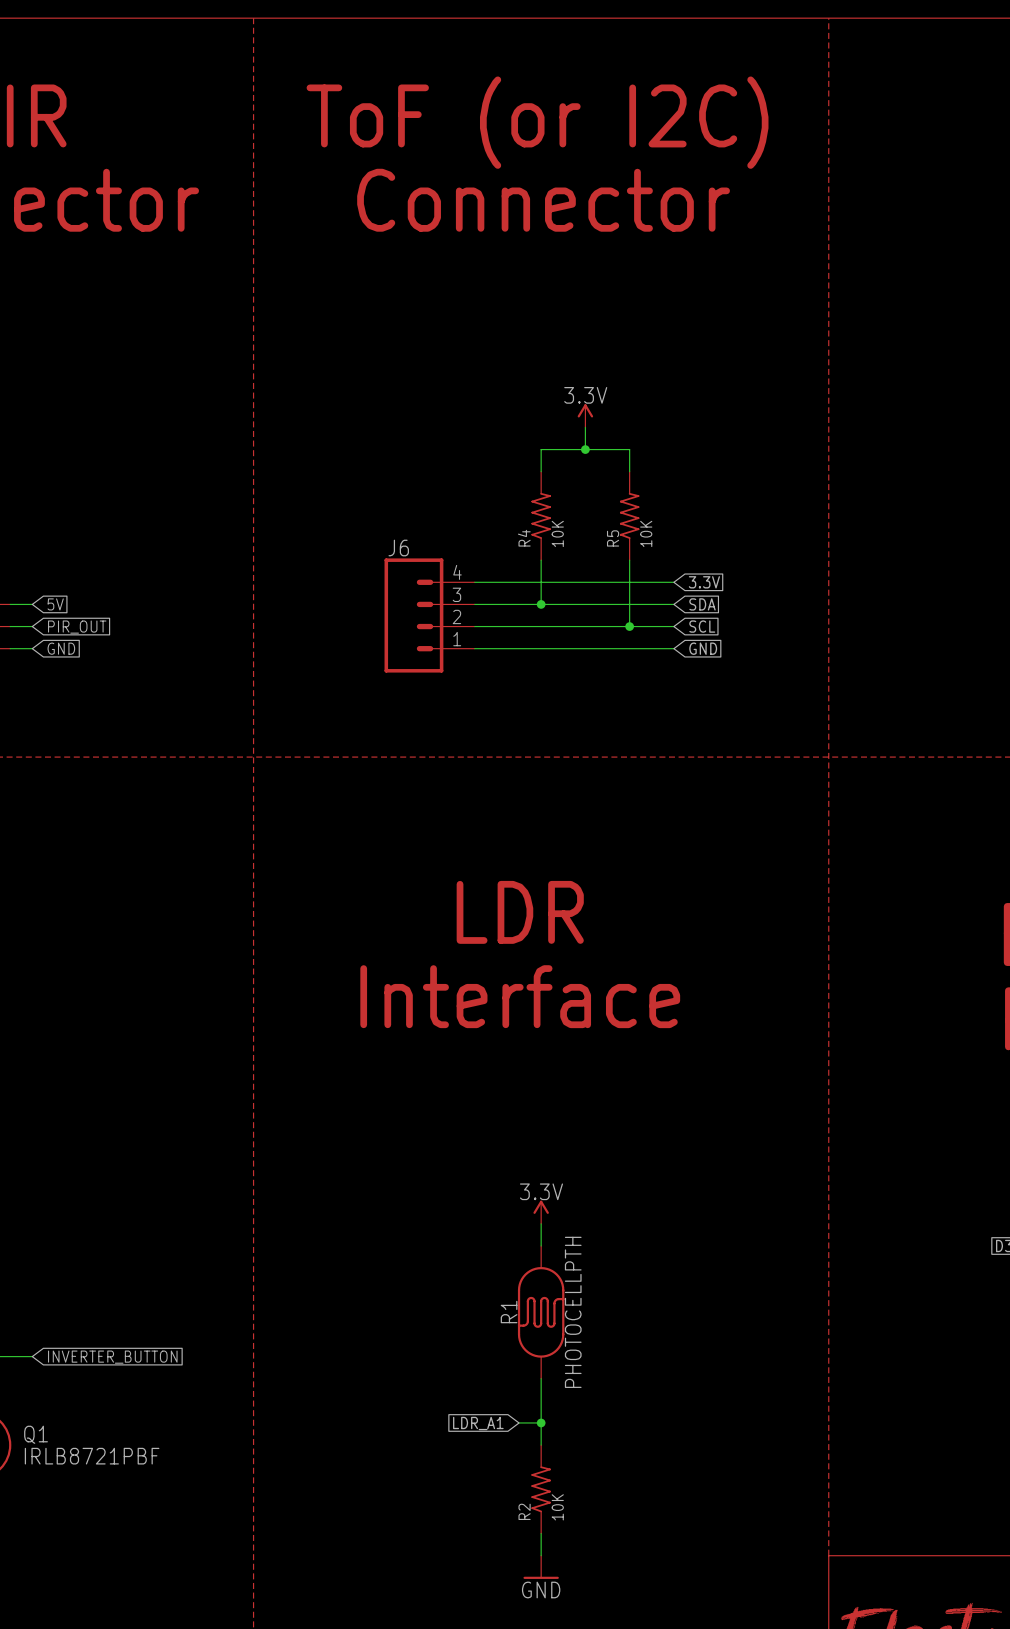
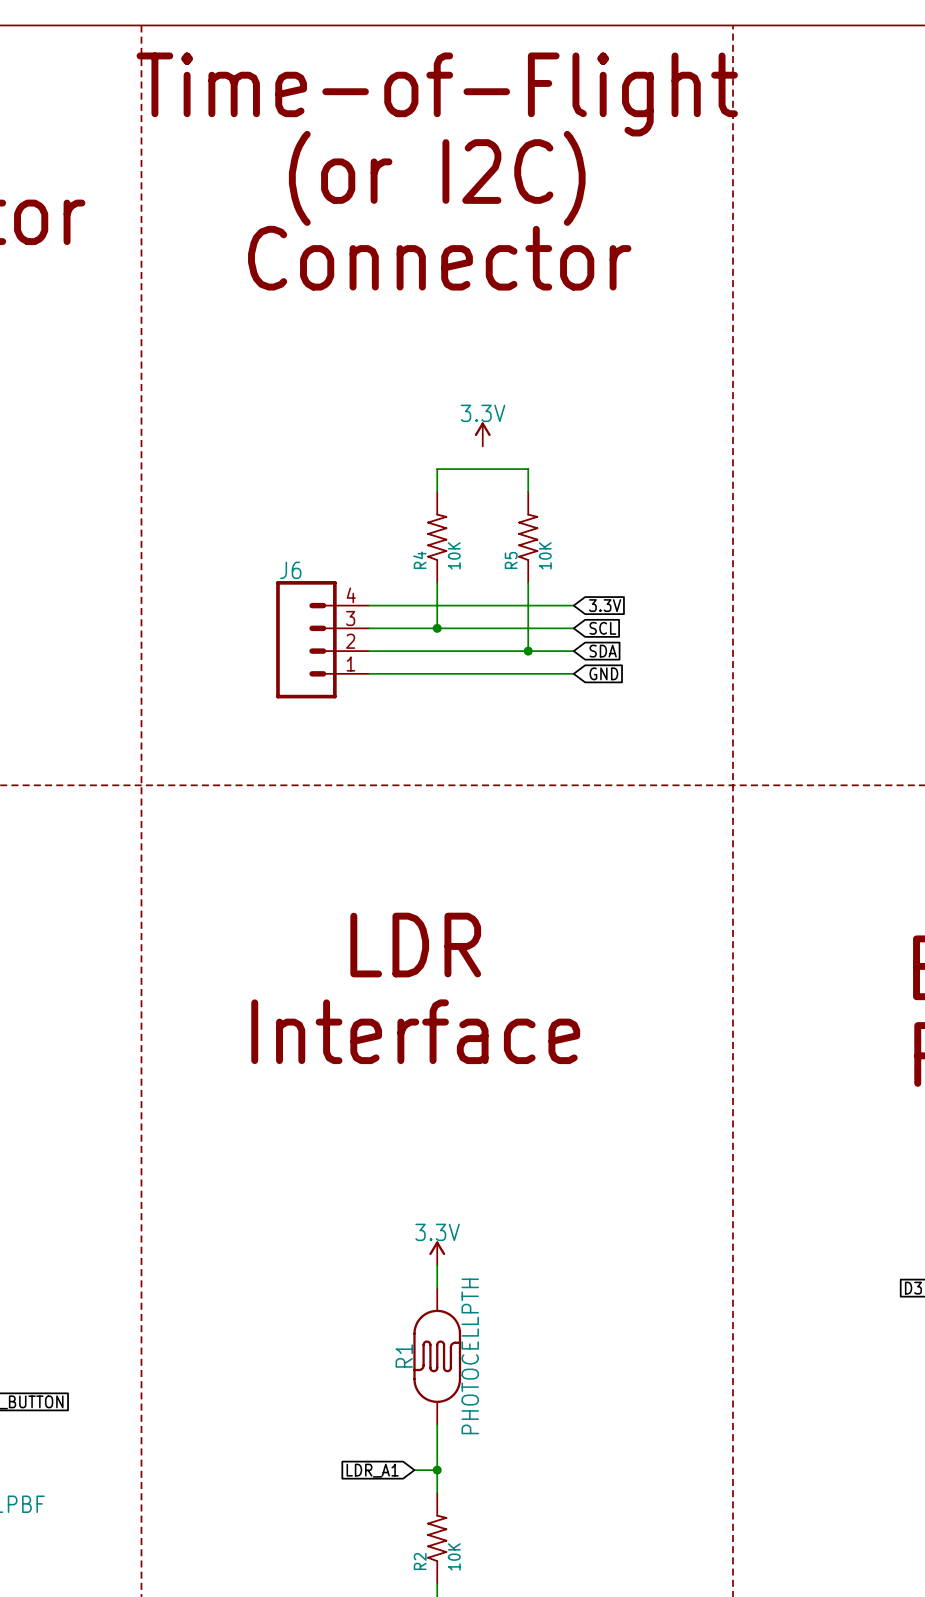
text: none -> Time-of-Flight (437, 94)
text: ToF (or I2C) (537, 122) -> (or I2C) (437, 178)
text position: Connector (543, 200) -> Connector (439, 258)
wire: (585, 427) (585, 449) -> none
junction: (585, 449) -> none
global label: SDA (702, 604) -> SCL (602, 628)
global label: SCL (702, 626) -> SDA (603, 651)

